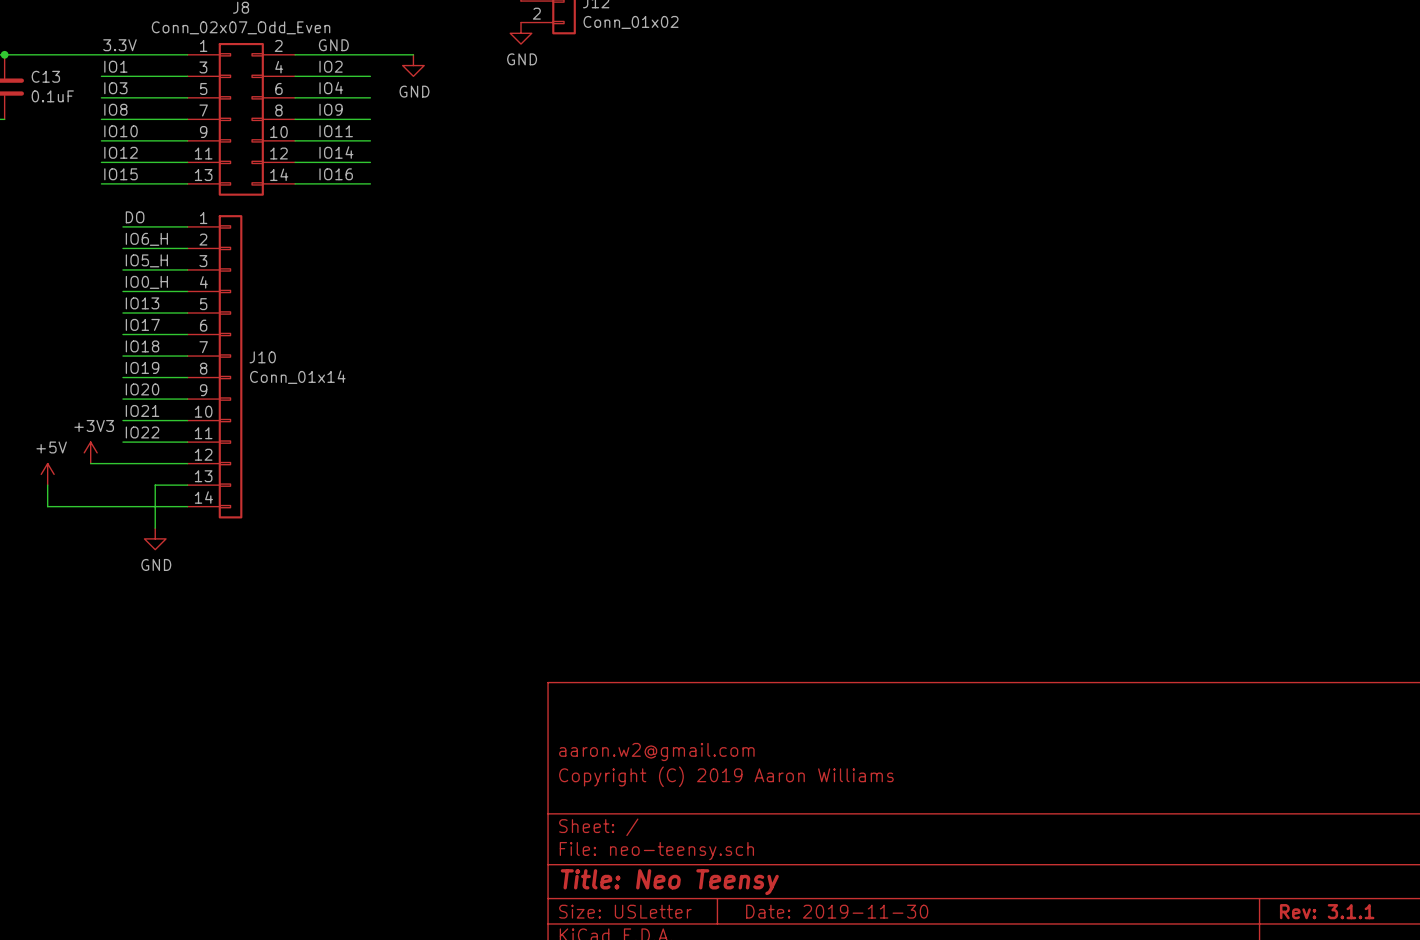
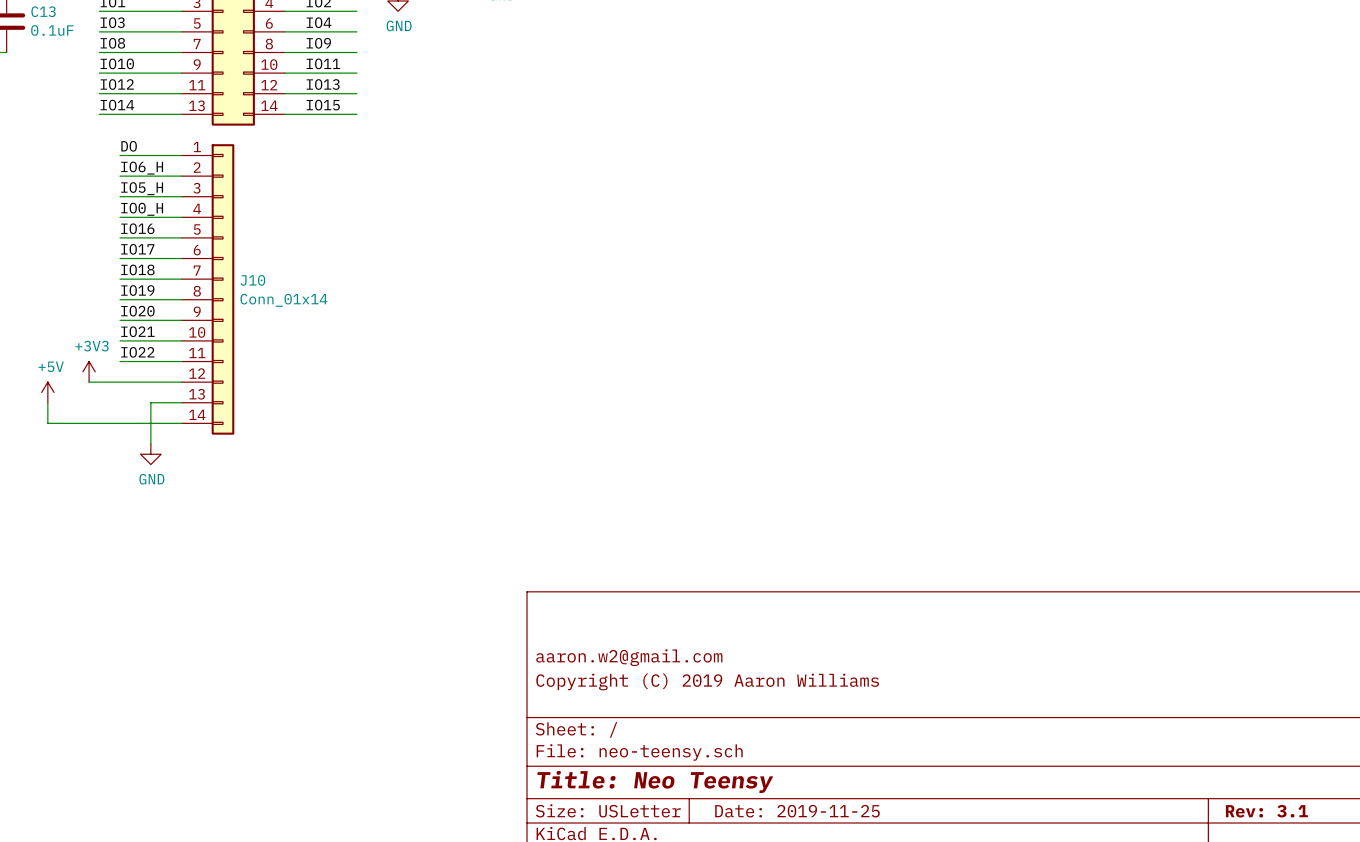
label: IO14 (336, 152) -> IO13 (323, 84)
label: IO15 (121, 174) -> IO14 (117, 105)
label: IO16 (336, 174) -> IO15 (323, 105)
label: IO13 (142, 303) -> IO16 (137, 228)
title block: Date: 2019-11-30 (837, 911) -> Date: 2019-11-25 (797, 811)
title block: Rev: 3.1.1 (1327, 911) -> Rev: 3.1 (1266, 811)

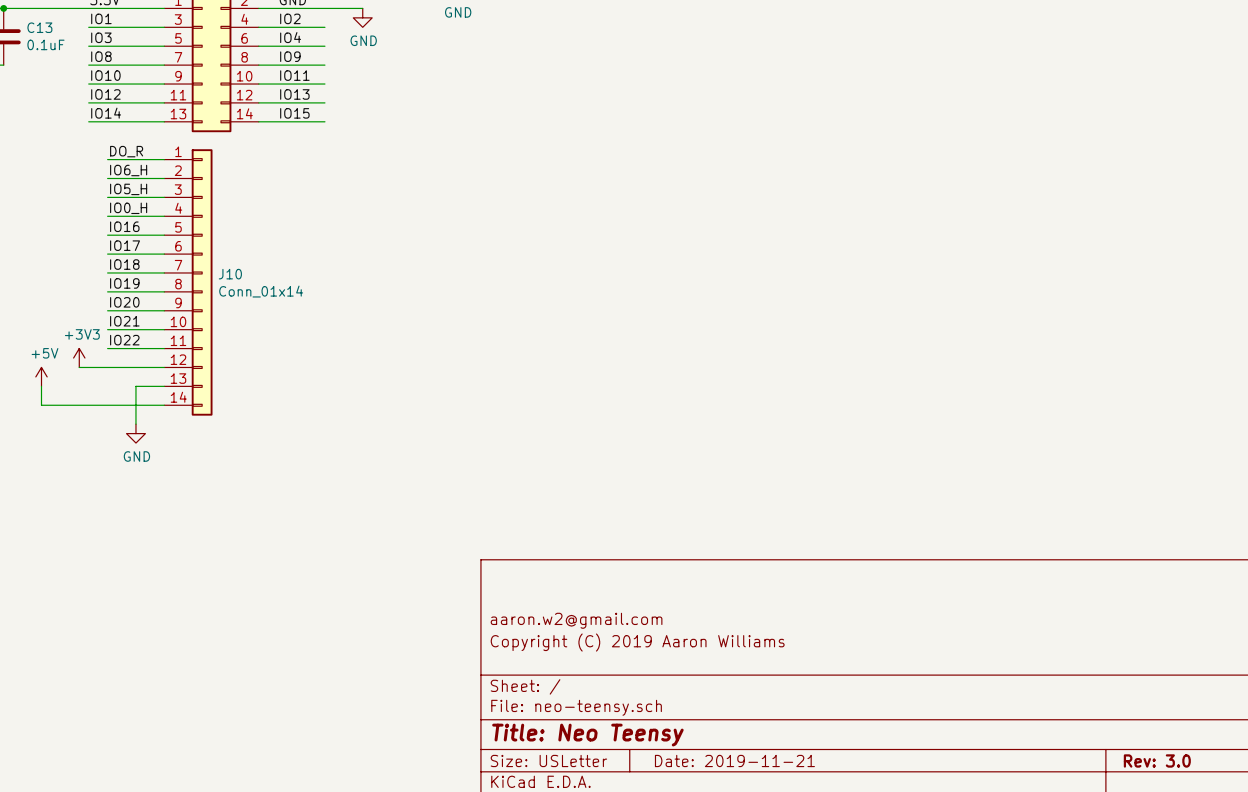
label: DO (129, 146) -> DO_R (126, 151)
title block: Date: 2019-11-25 (797, 811) -> Date: 2019-11-21 (734, 760)
title block: Rev: 3.1 (1266, 811) -> Rev: 3.0 (1157, 760)

